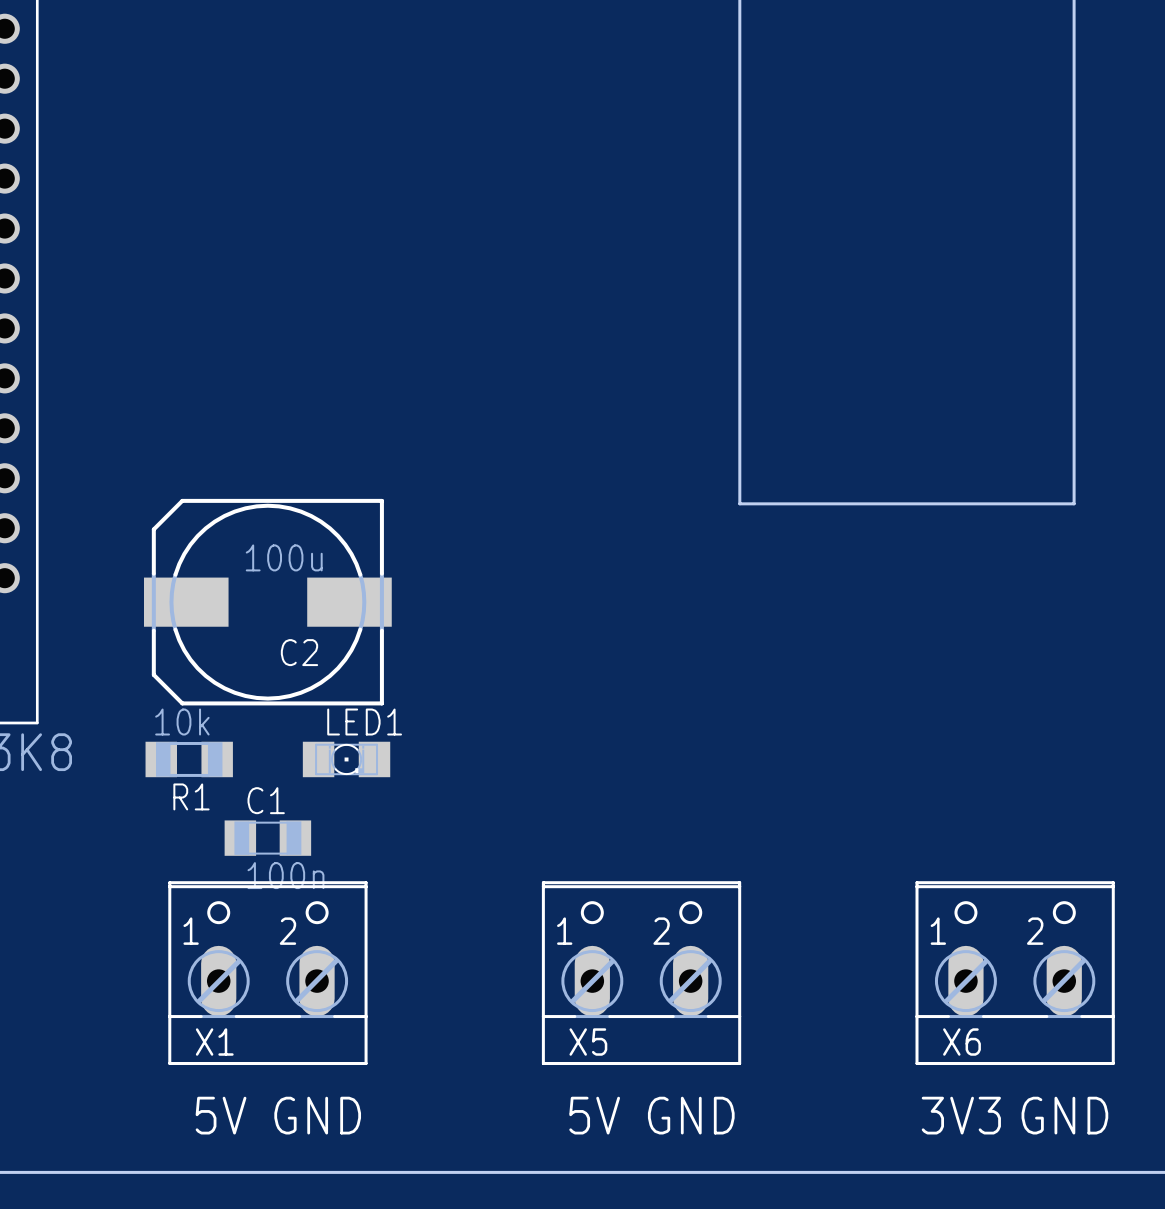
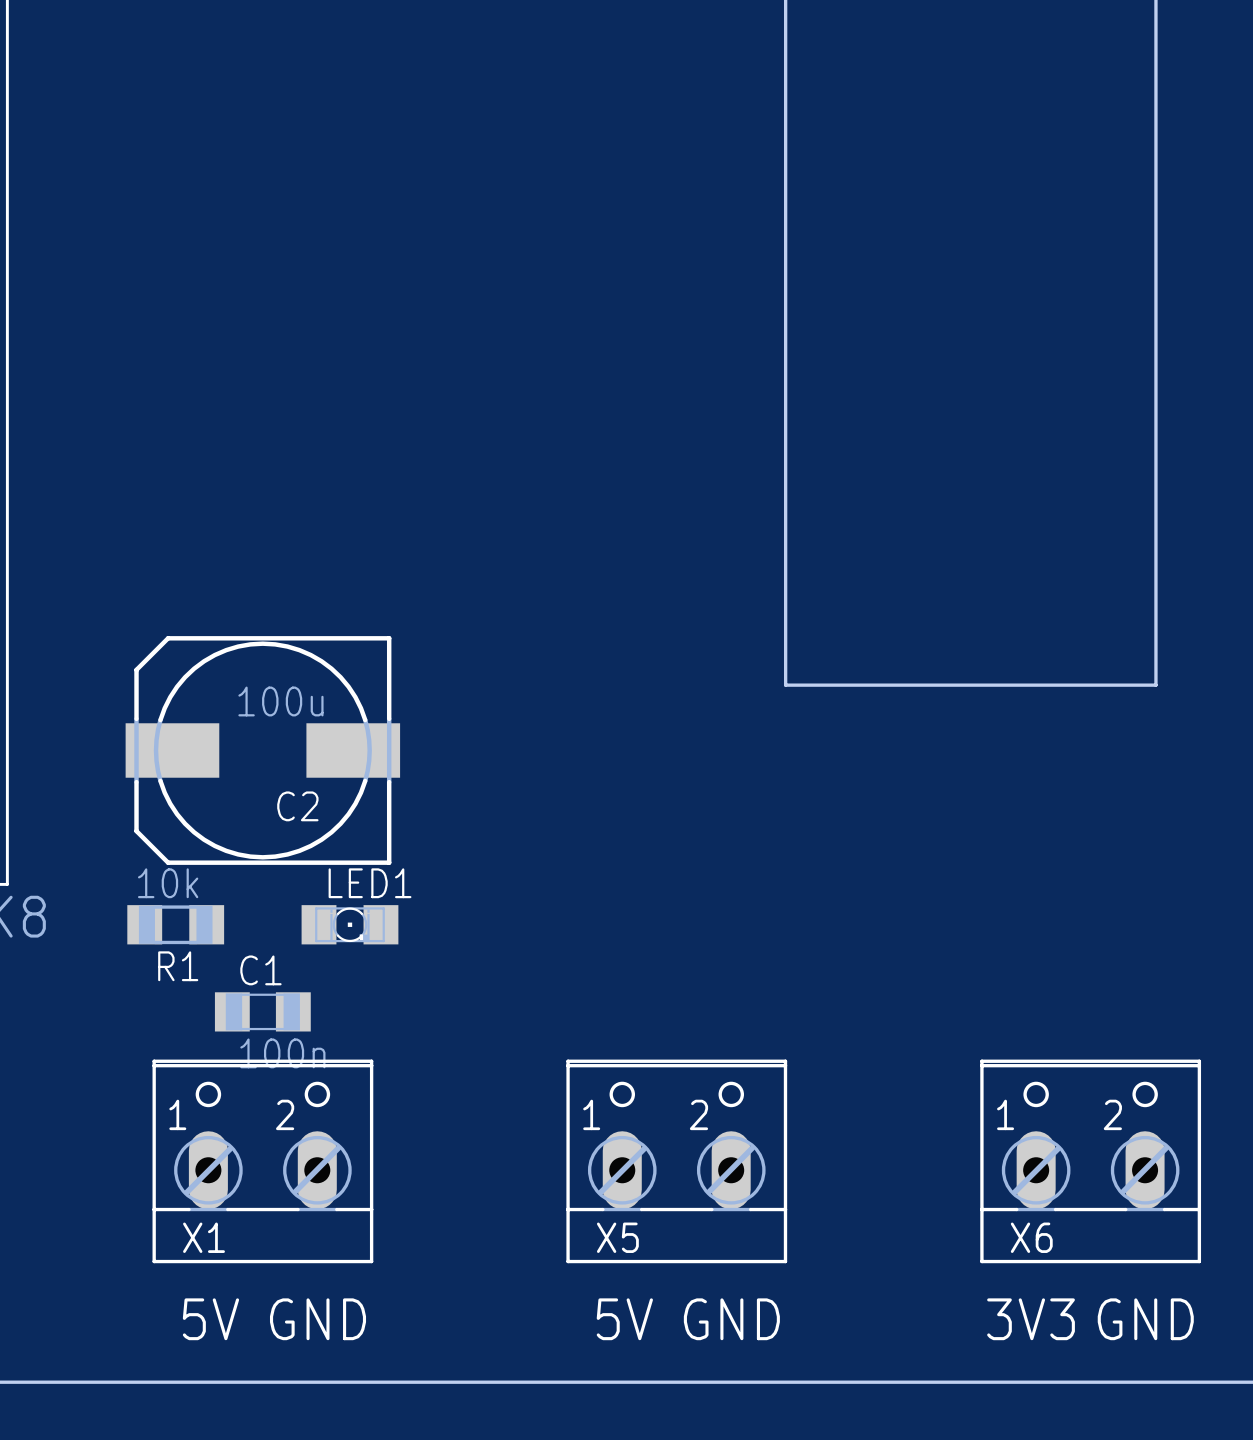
board edge: (739, 503) (1074, 503) -> (785, 641) (785, 685) (1155, 685) (1155, 641)

